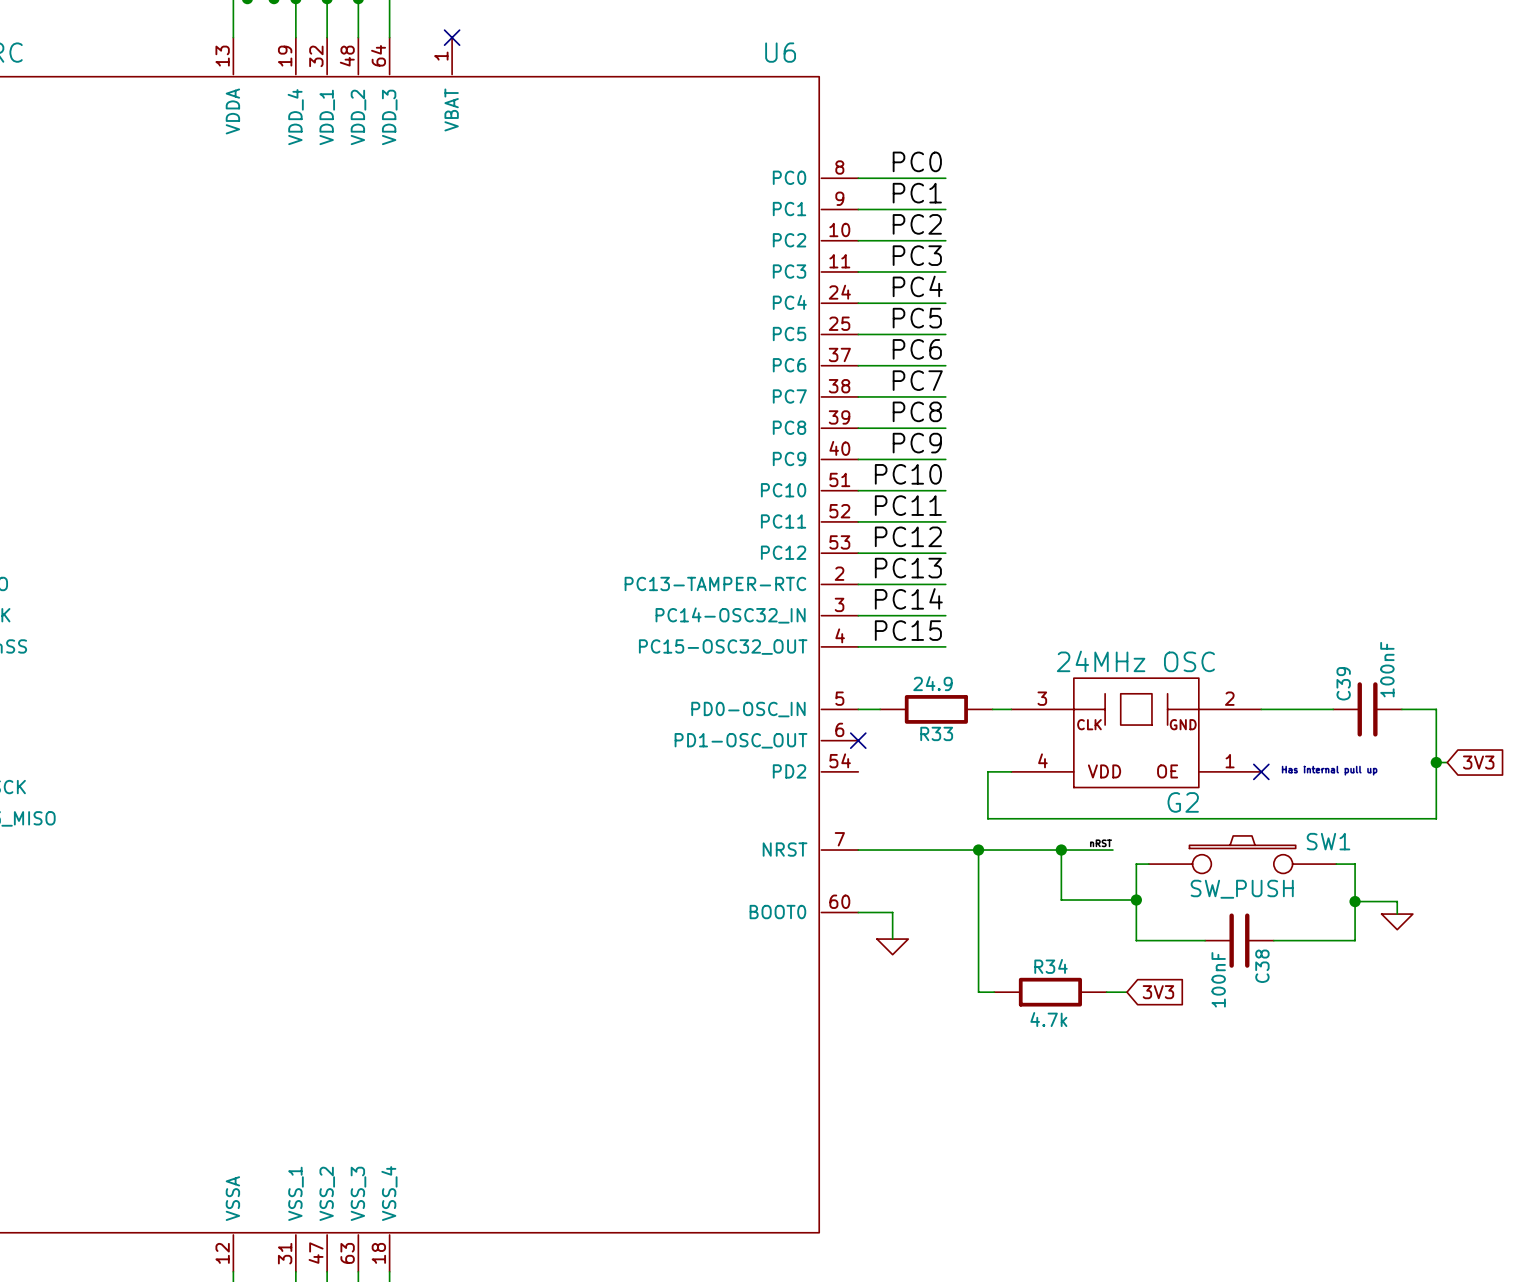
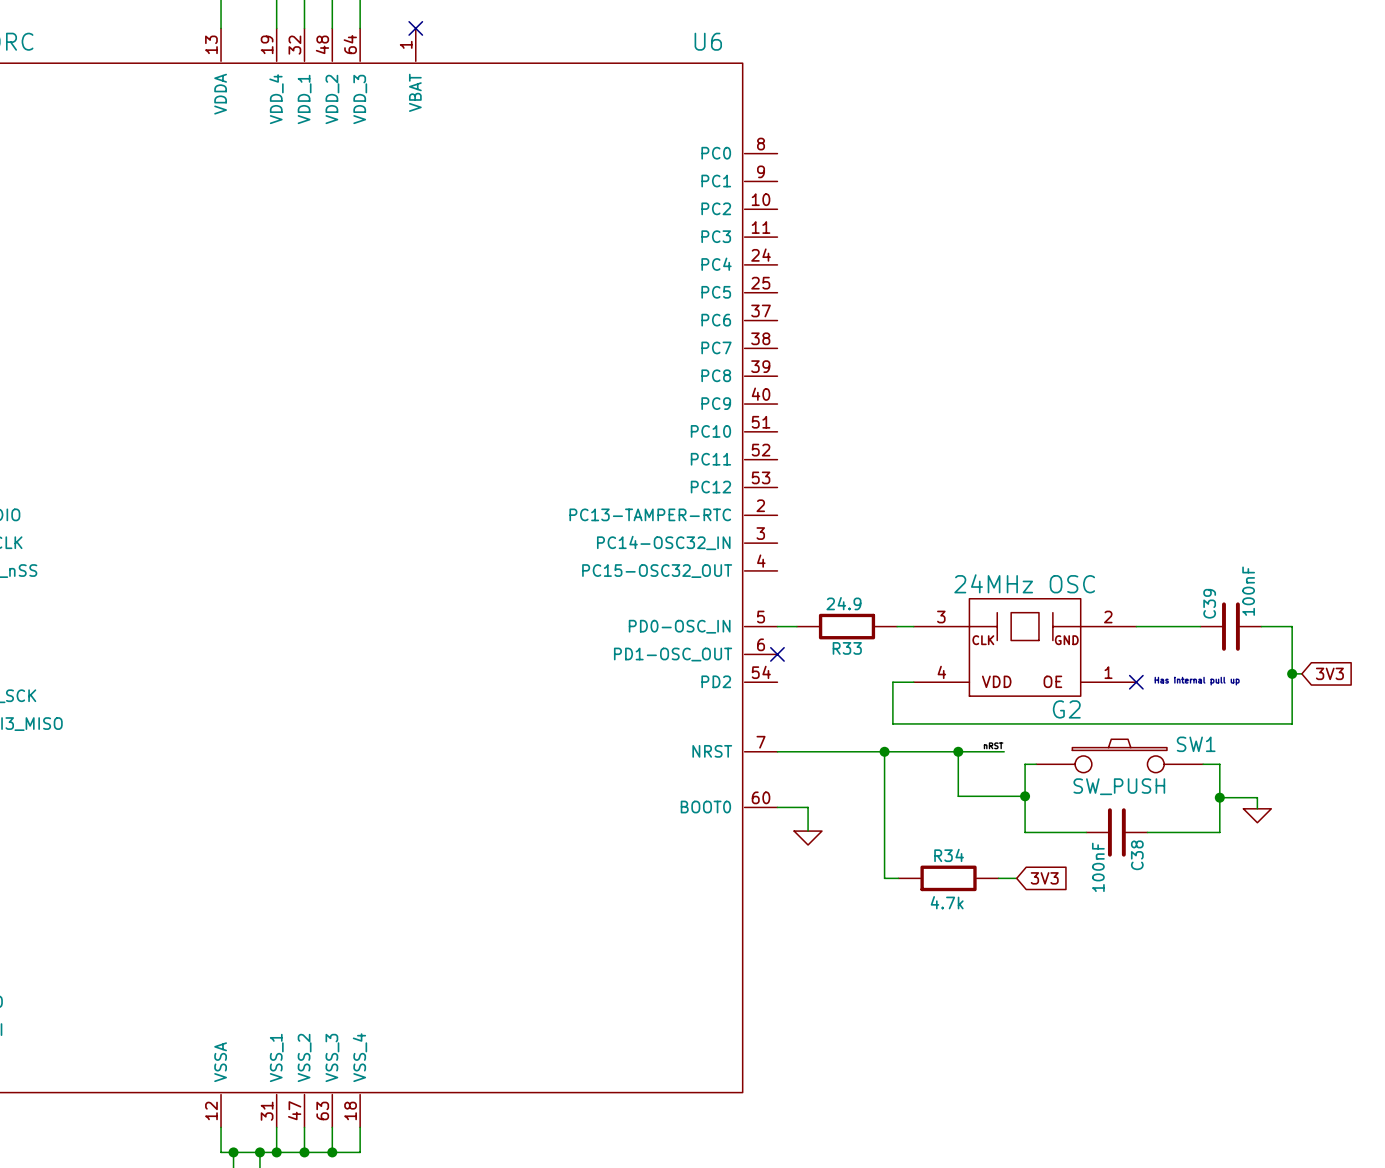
label: PC0 (917, 161) -> none
wire: (858, 178) (945, 178) -> none
label: PC1 (917, 193) -> none
wire: (858, 209) (945, 209) -> none
label: PC2 (917, 224) -> none
wire: (858, 240) (945, 240) -> none
label: PC3 (917, 255) -> none
wire: (858, 271) (945, 271) -> none
label: PC4 (917, 286) -> none
wire: (858, 303) (945, 303) -> none
label: PC5 (917, 318) -> none
wire: (858, 334) (945, 334) -> none
label: PC6 (917, 349) -> none
wire: (858, 365) (945, 365) -> none
label: PC7 (917, 380) -> none
wire: (858, 396) (945, 396) -> none
label: PC8 (917, 411) -> none
wire: (858, 428) (945, 428) -> none
label: PC9 (917, 443) -> none
wire: (858, 459) (945, 459) -> none
label: PC10 (908, 474) -> none
wire: (858, 490) (945, 490) -> none
label: PC11 (908, 505) -> none
wire: (858, 521) (945, 521) -> none
label: PC12 (908, 536) -> none
wire: (858, 553) (945, 553) -> none
label: PC13 (908, 568) -> none
wire: (858, 584) (945, 584) -> none
label: PC14 (908, 598) -> none
wire: (858, 615) (945, 615) -> none
label: PC15 (908, 630) -> none
wire: (858, 646) (945, 646) -> none

